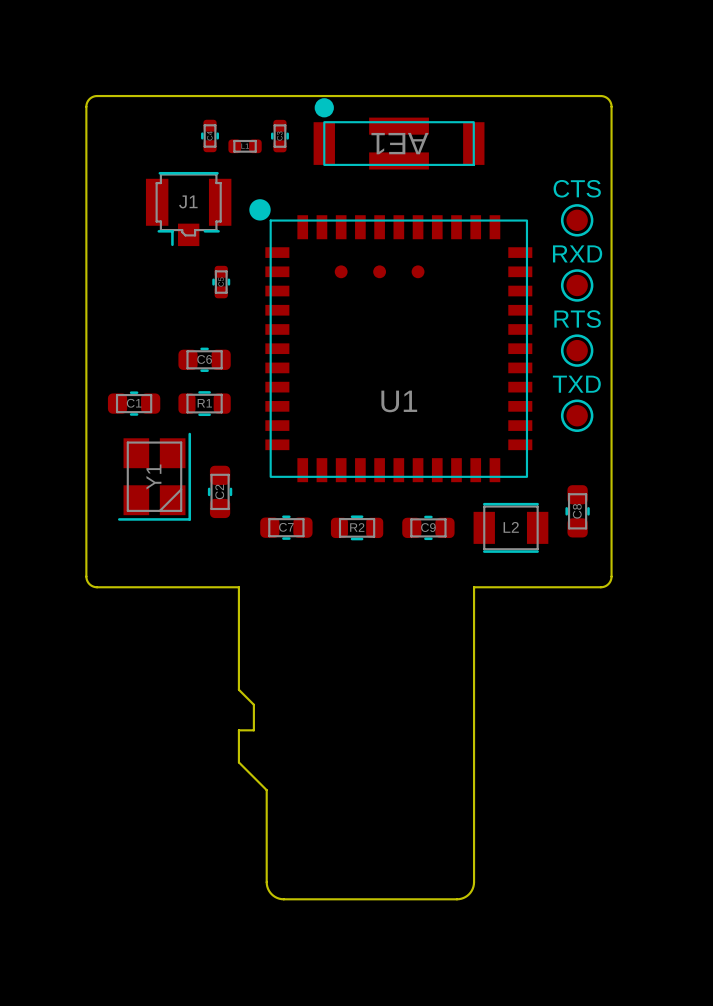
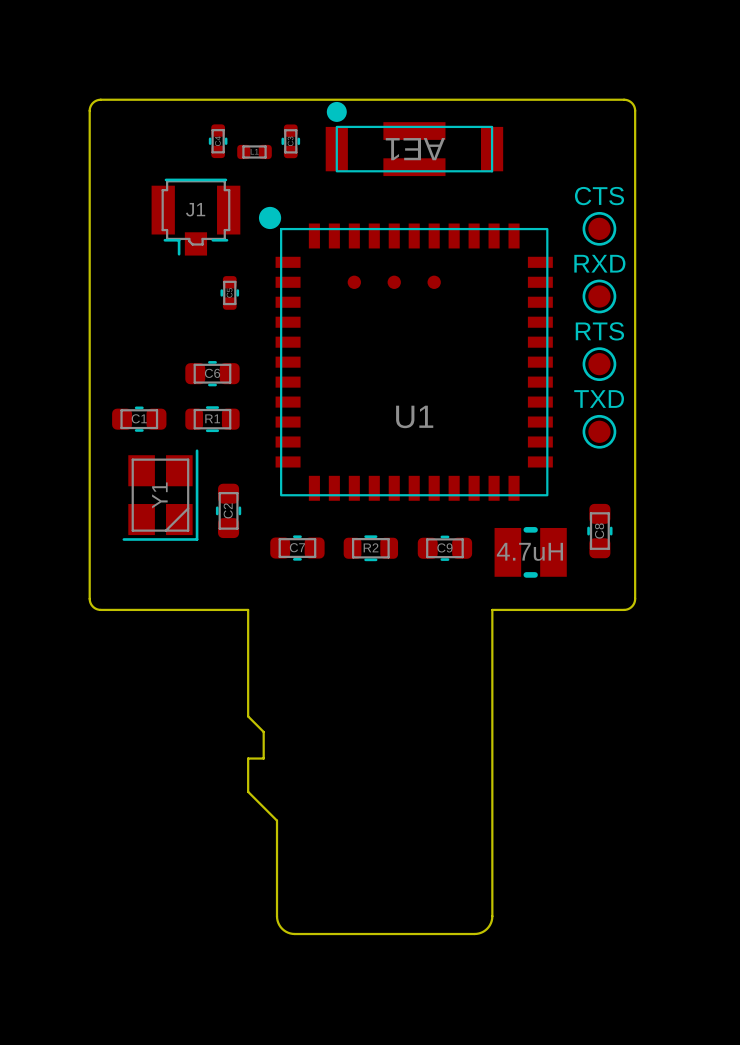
L2: (510, 527) -> none
part: none -> 4.7uH (530, 552)

